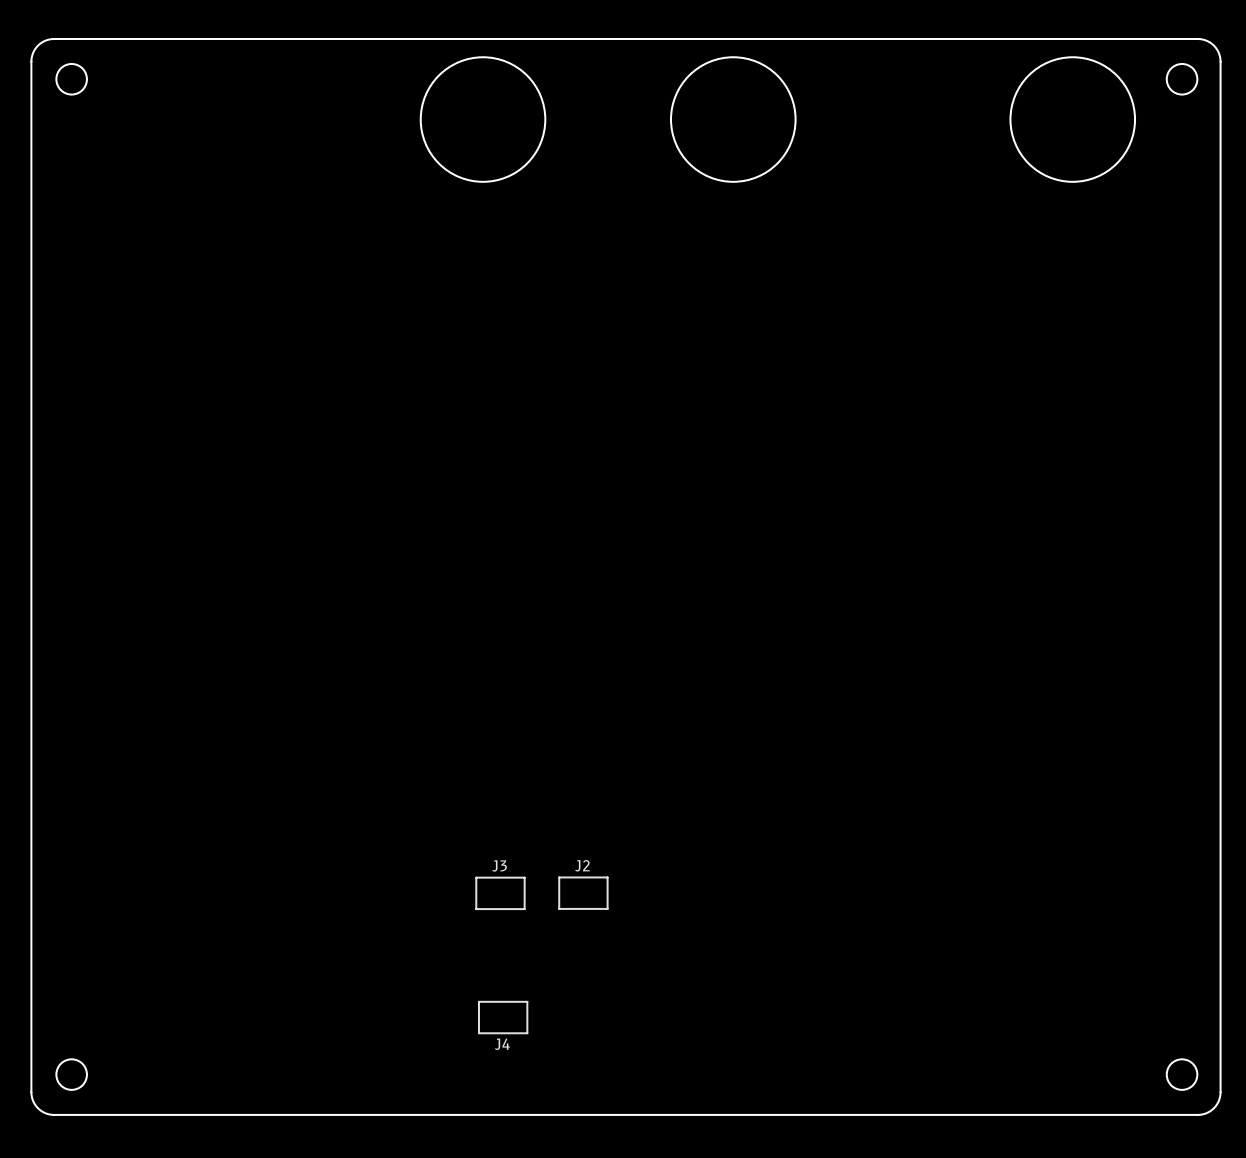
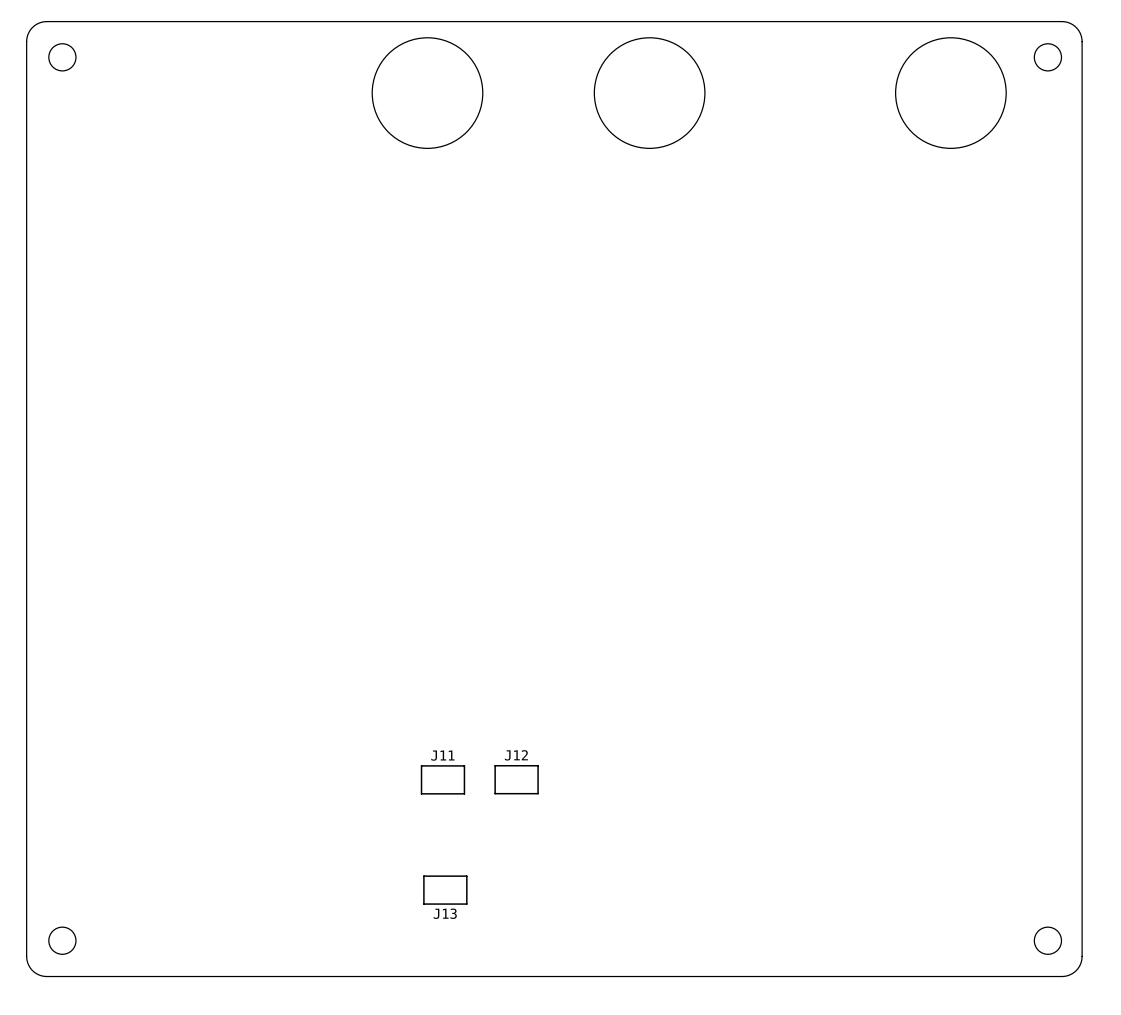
text: J3 (499, 865) -> J11 (442, 755)
text: J2 (582, 865) -> J12 (516, 755)
text: J4 (502, 1044) -> J13 (445, 913)

